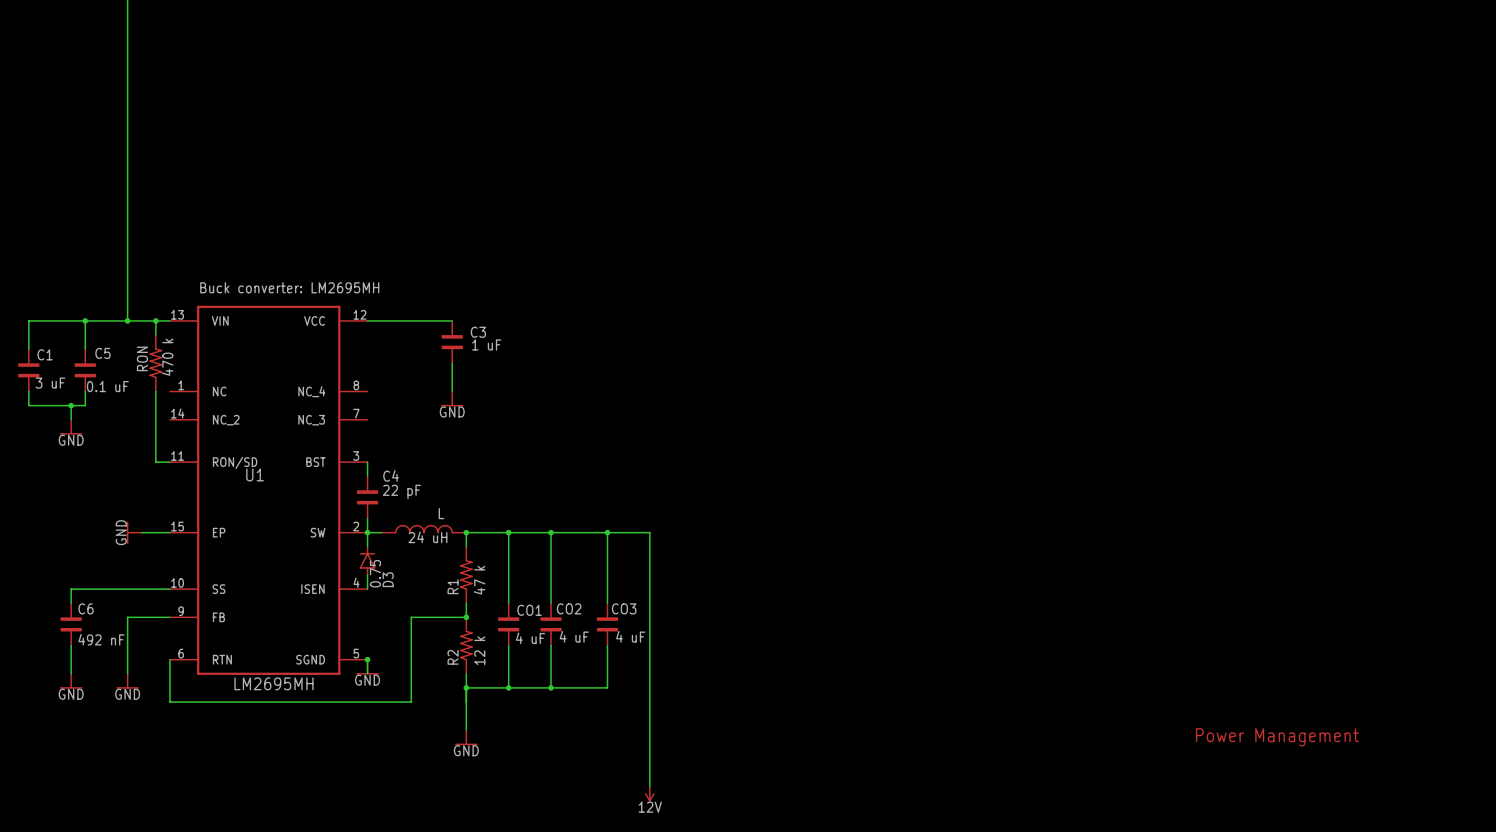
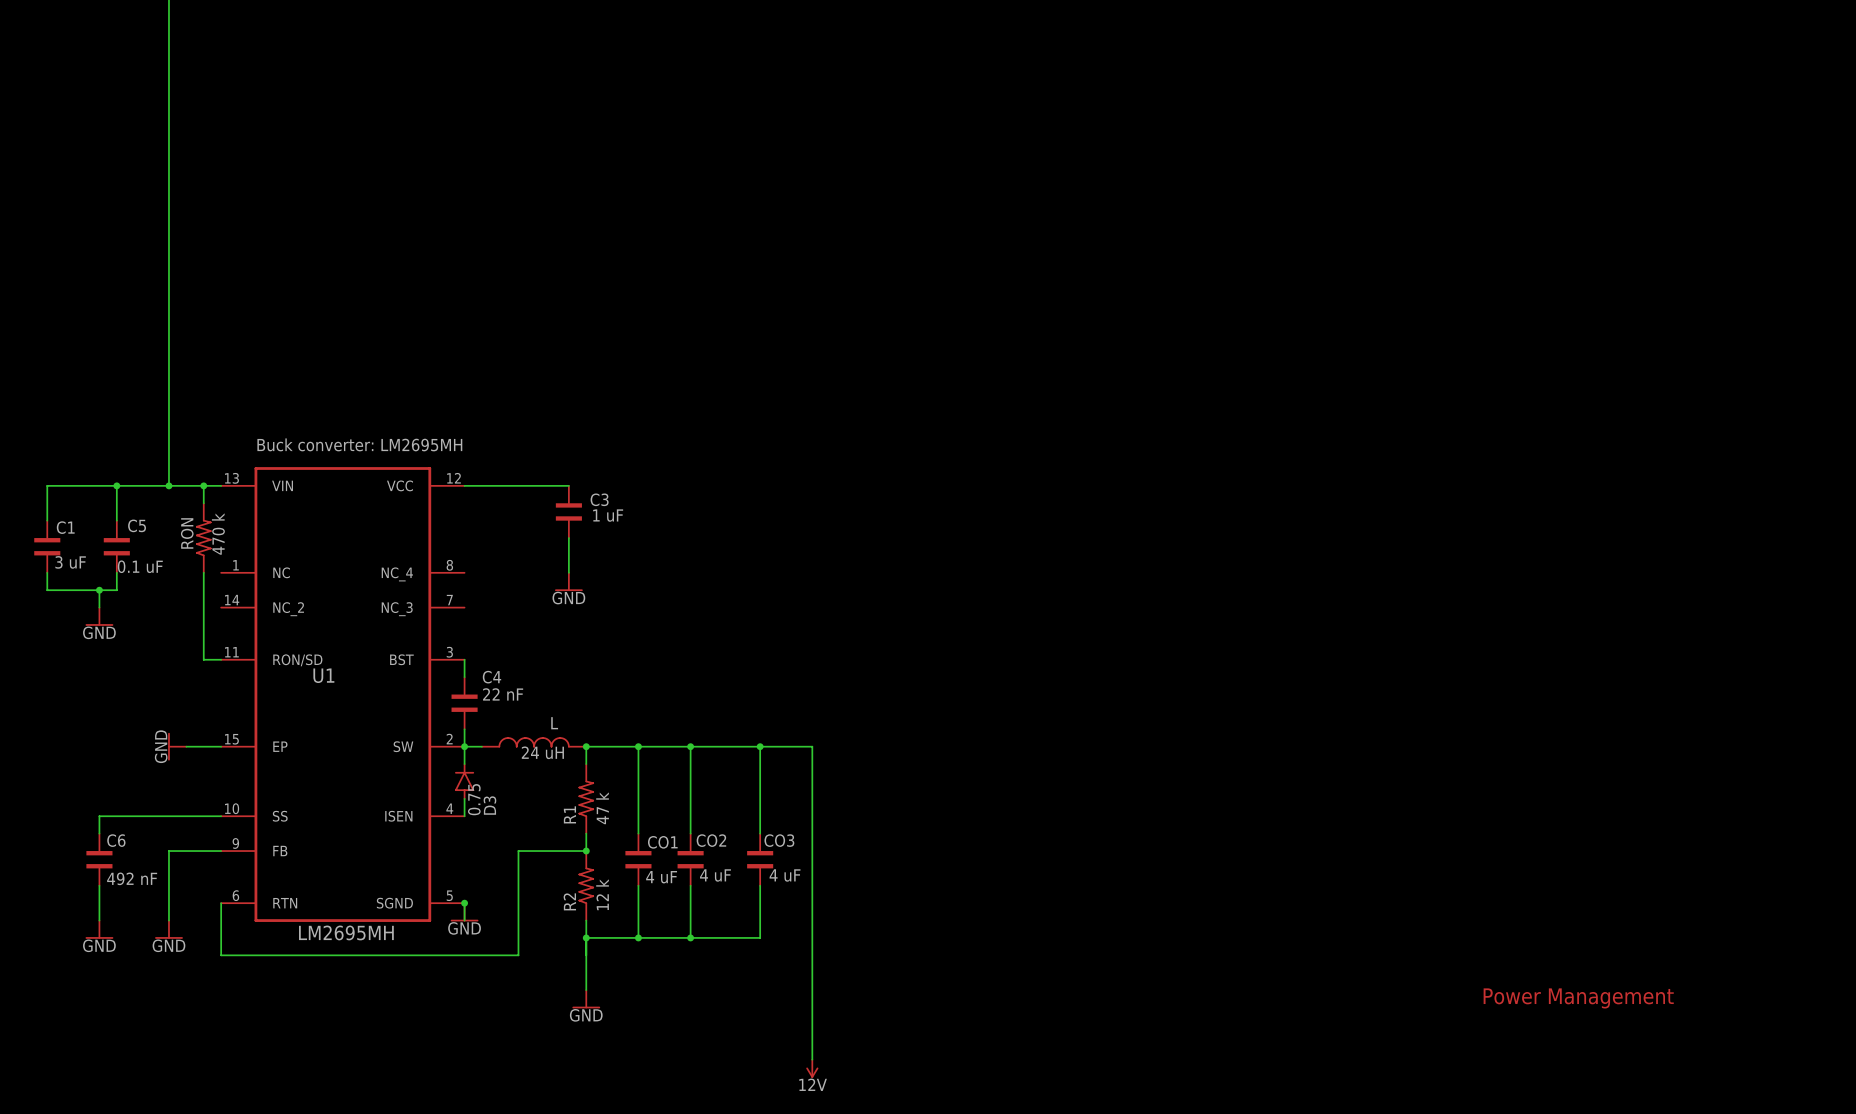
C4 value: 22 pF (401, 491) -> 22 nF (503, 694)

